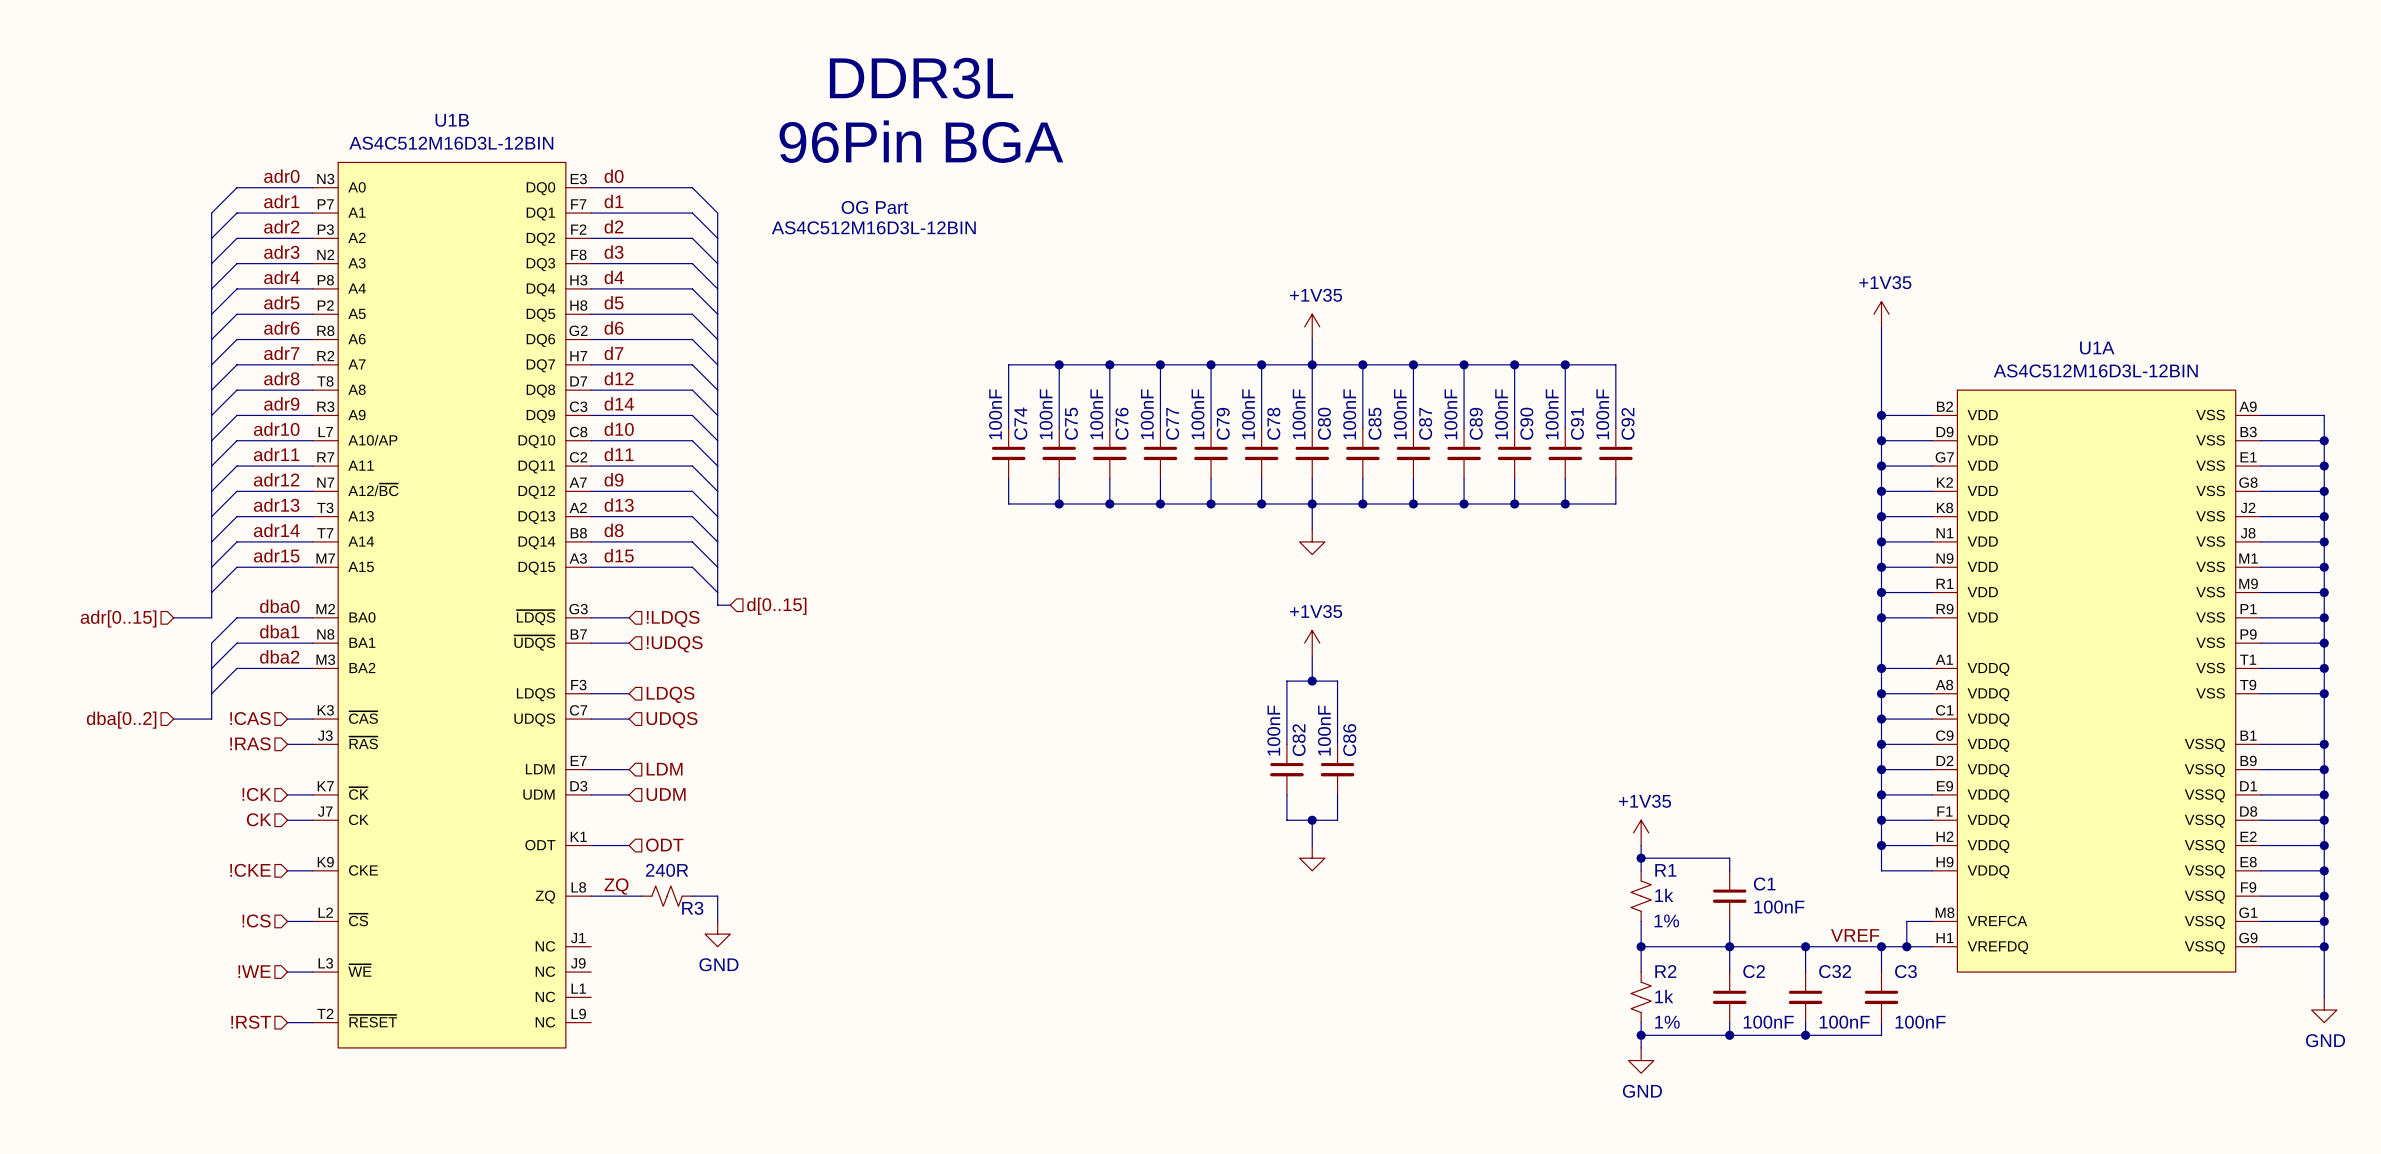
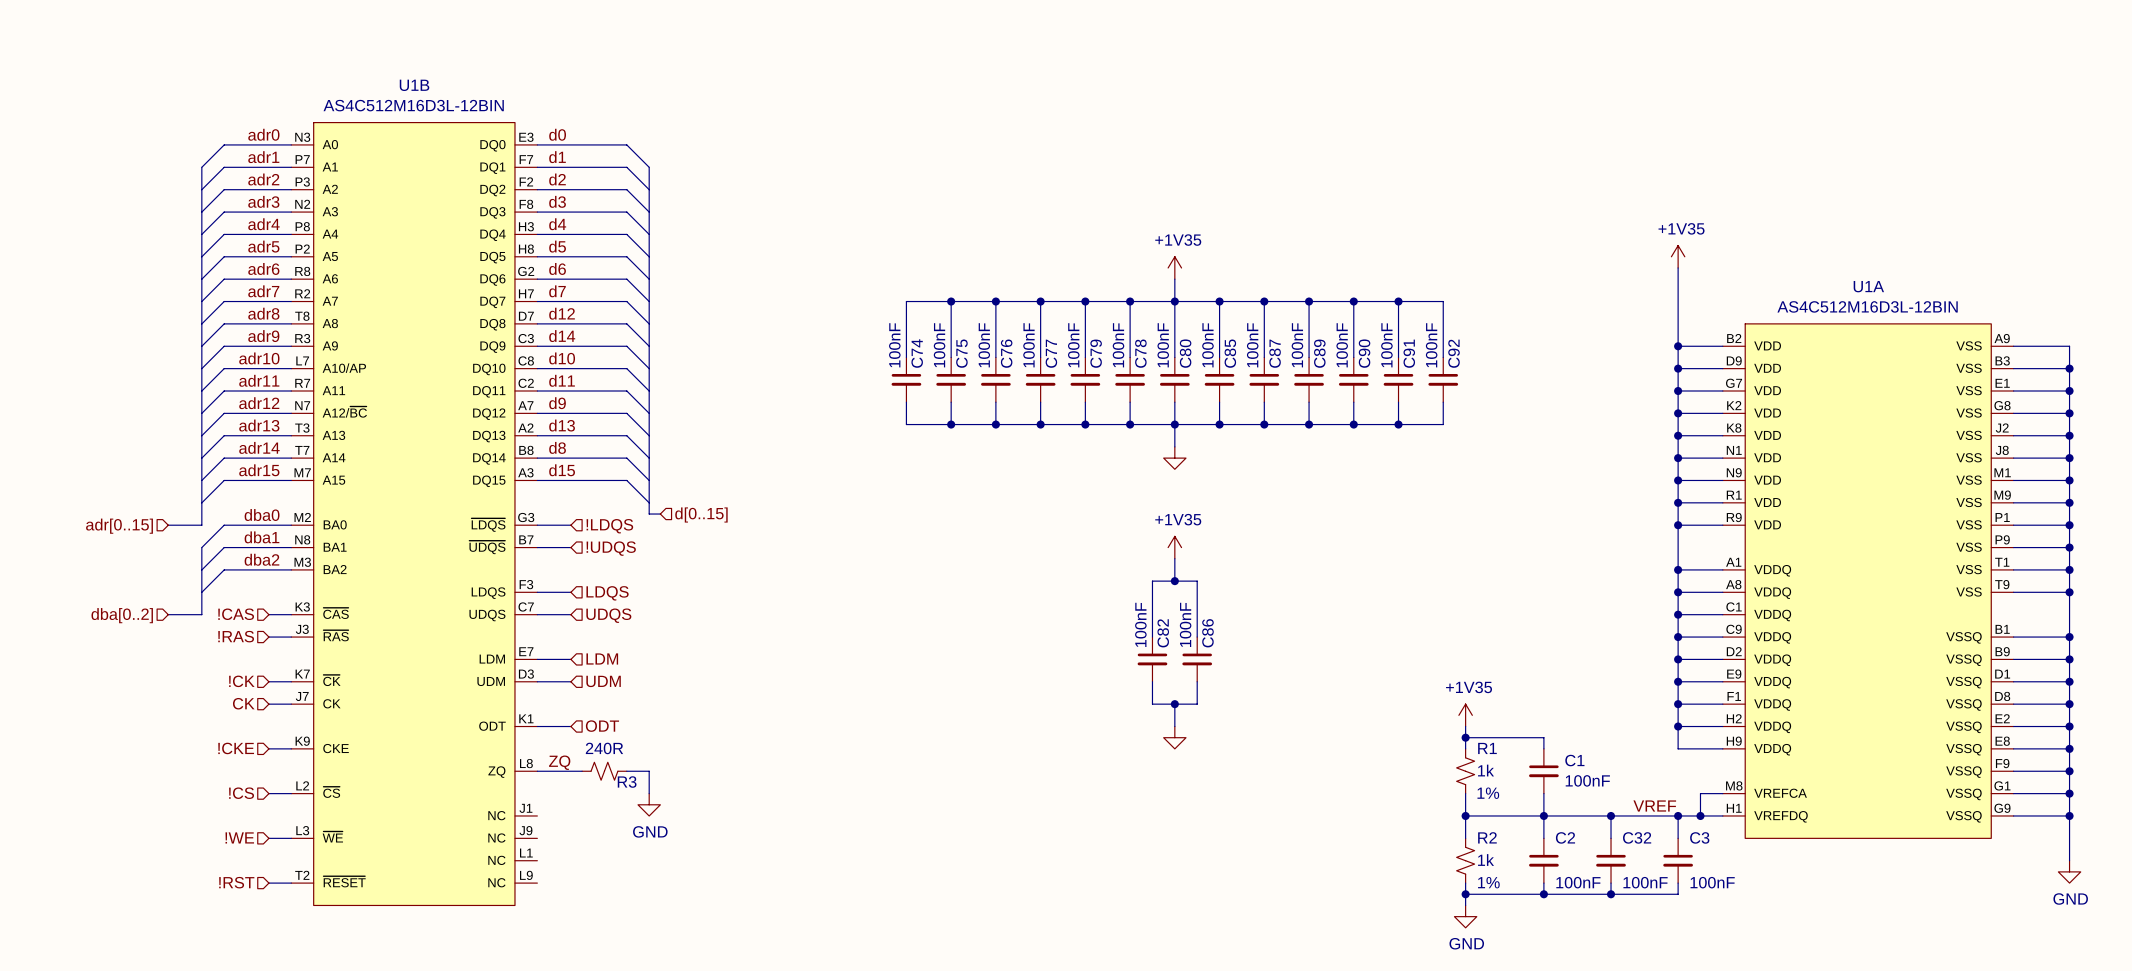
text: DDR3L (921, 78) -> none
text: 96Pin BGA (921, 141) -> none
text: OG Part (874, 207) -> none
text: AS4C512M16D3L-12BIN (873, 227) -> none

